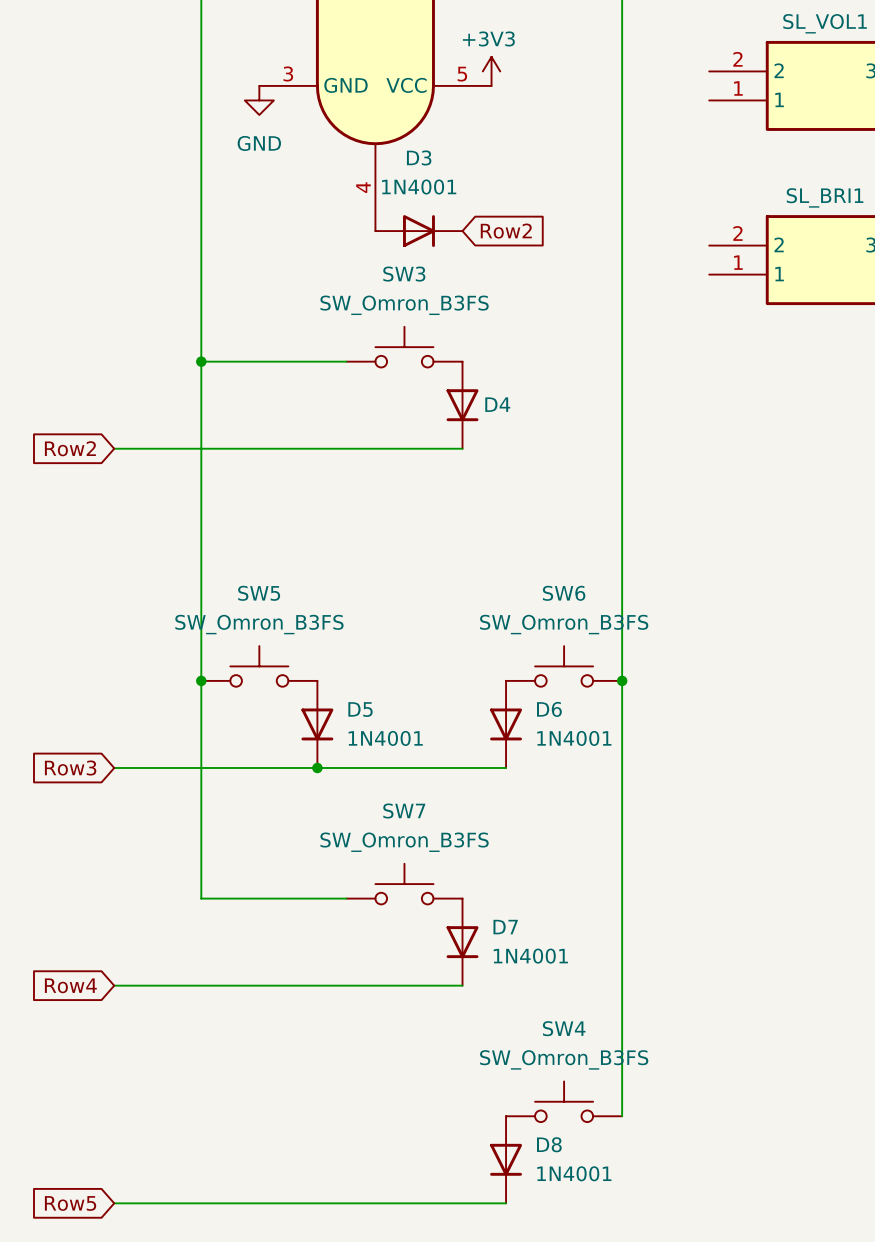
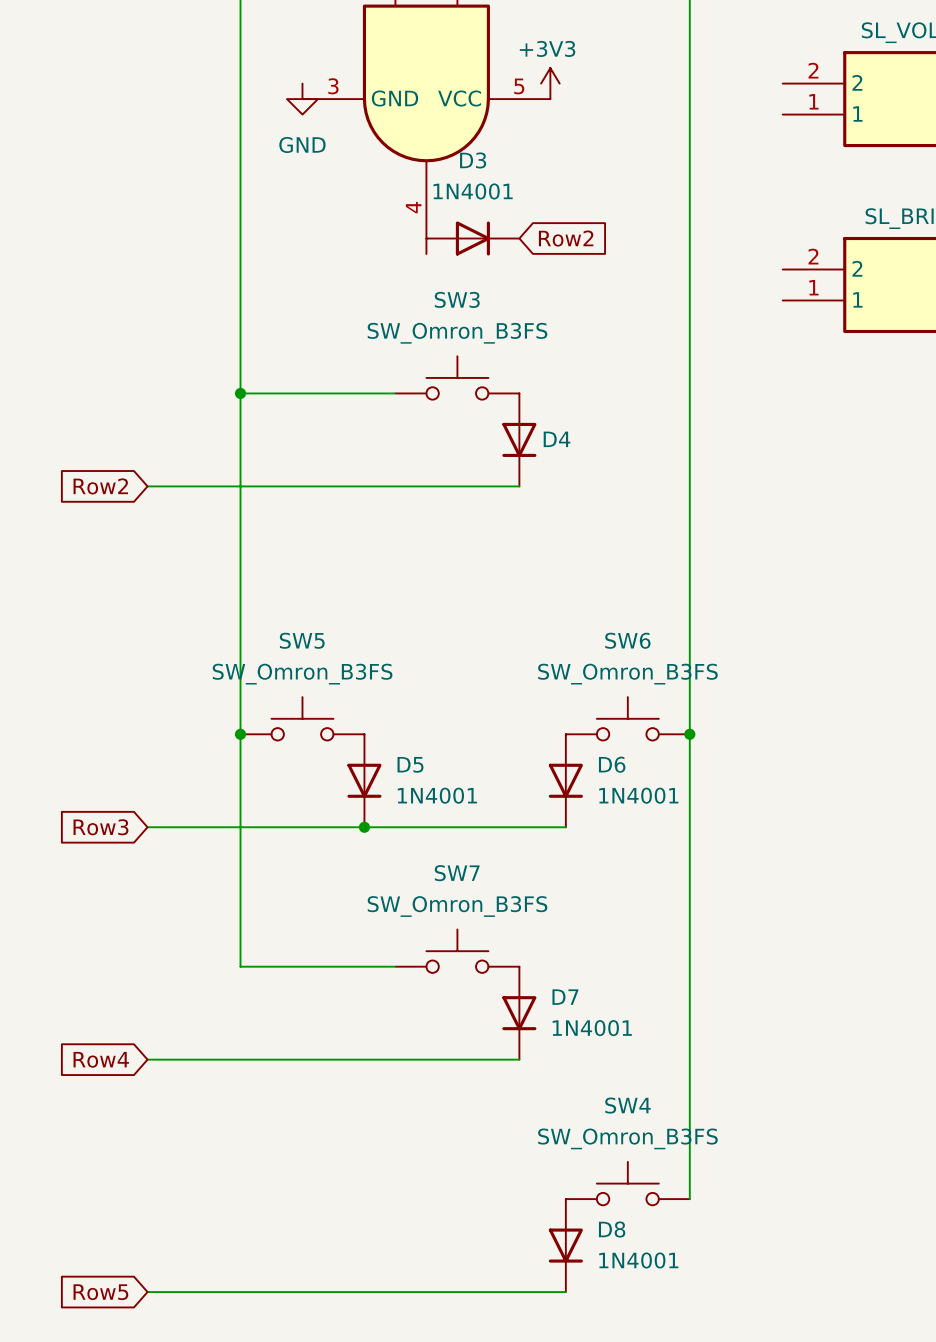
power symbol position: GND (259, 100) -> GND (302, 99)
D3 position: (418, 231) -> (472, 238)
global label position: Row2 (506, 231) -> Row2 (566, 238)

